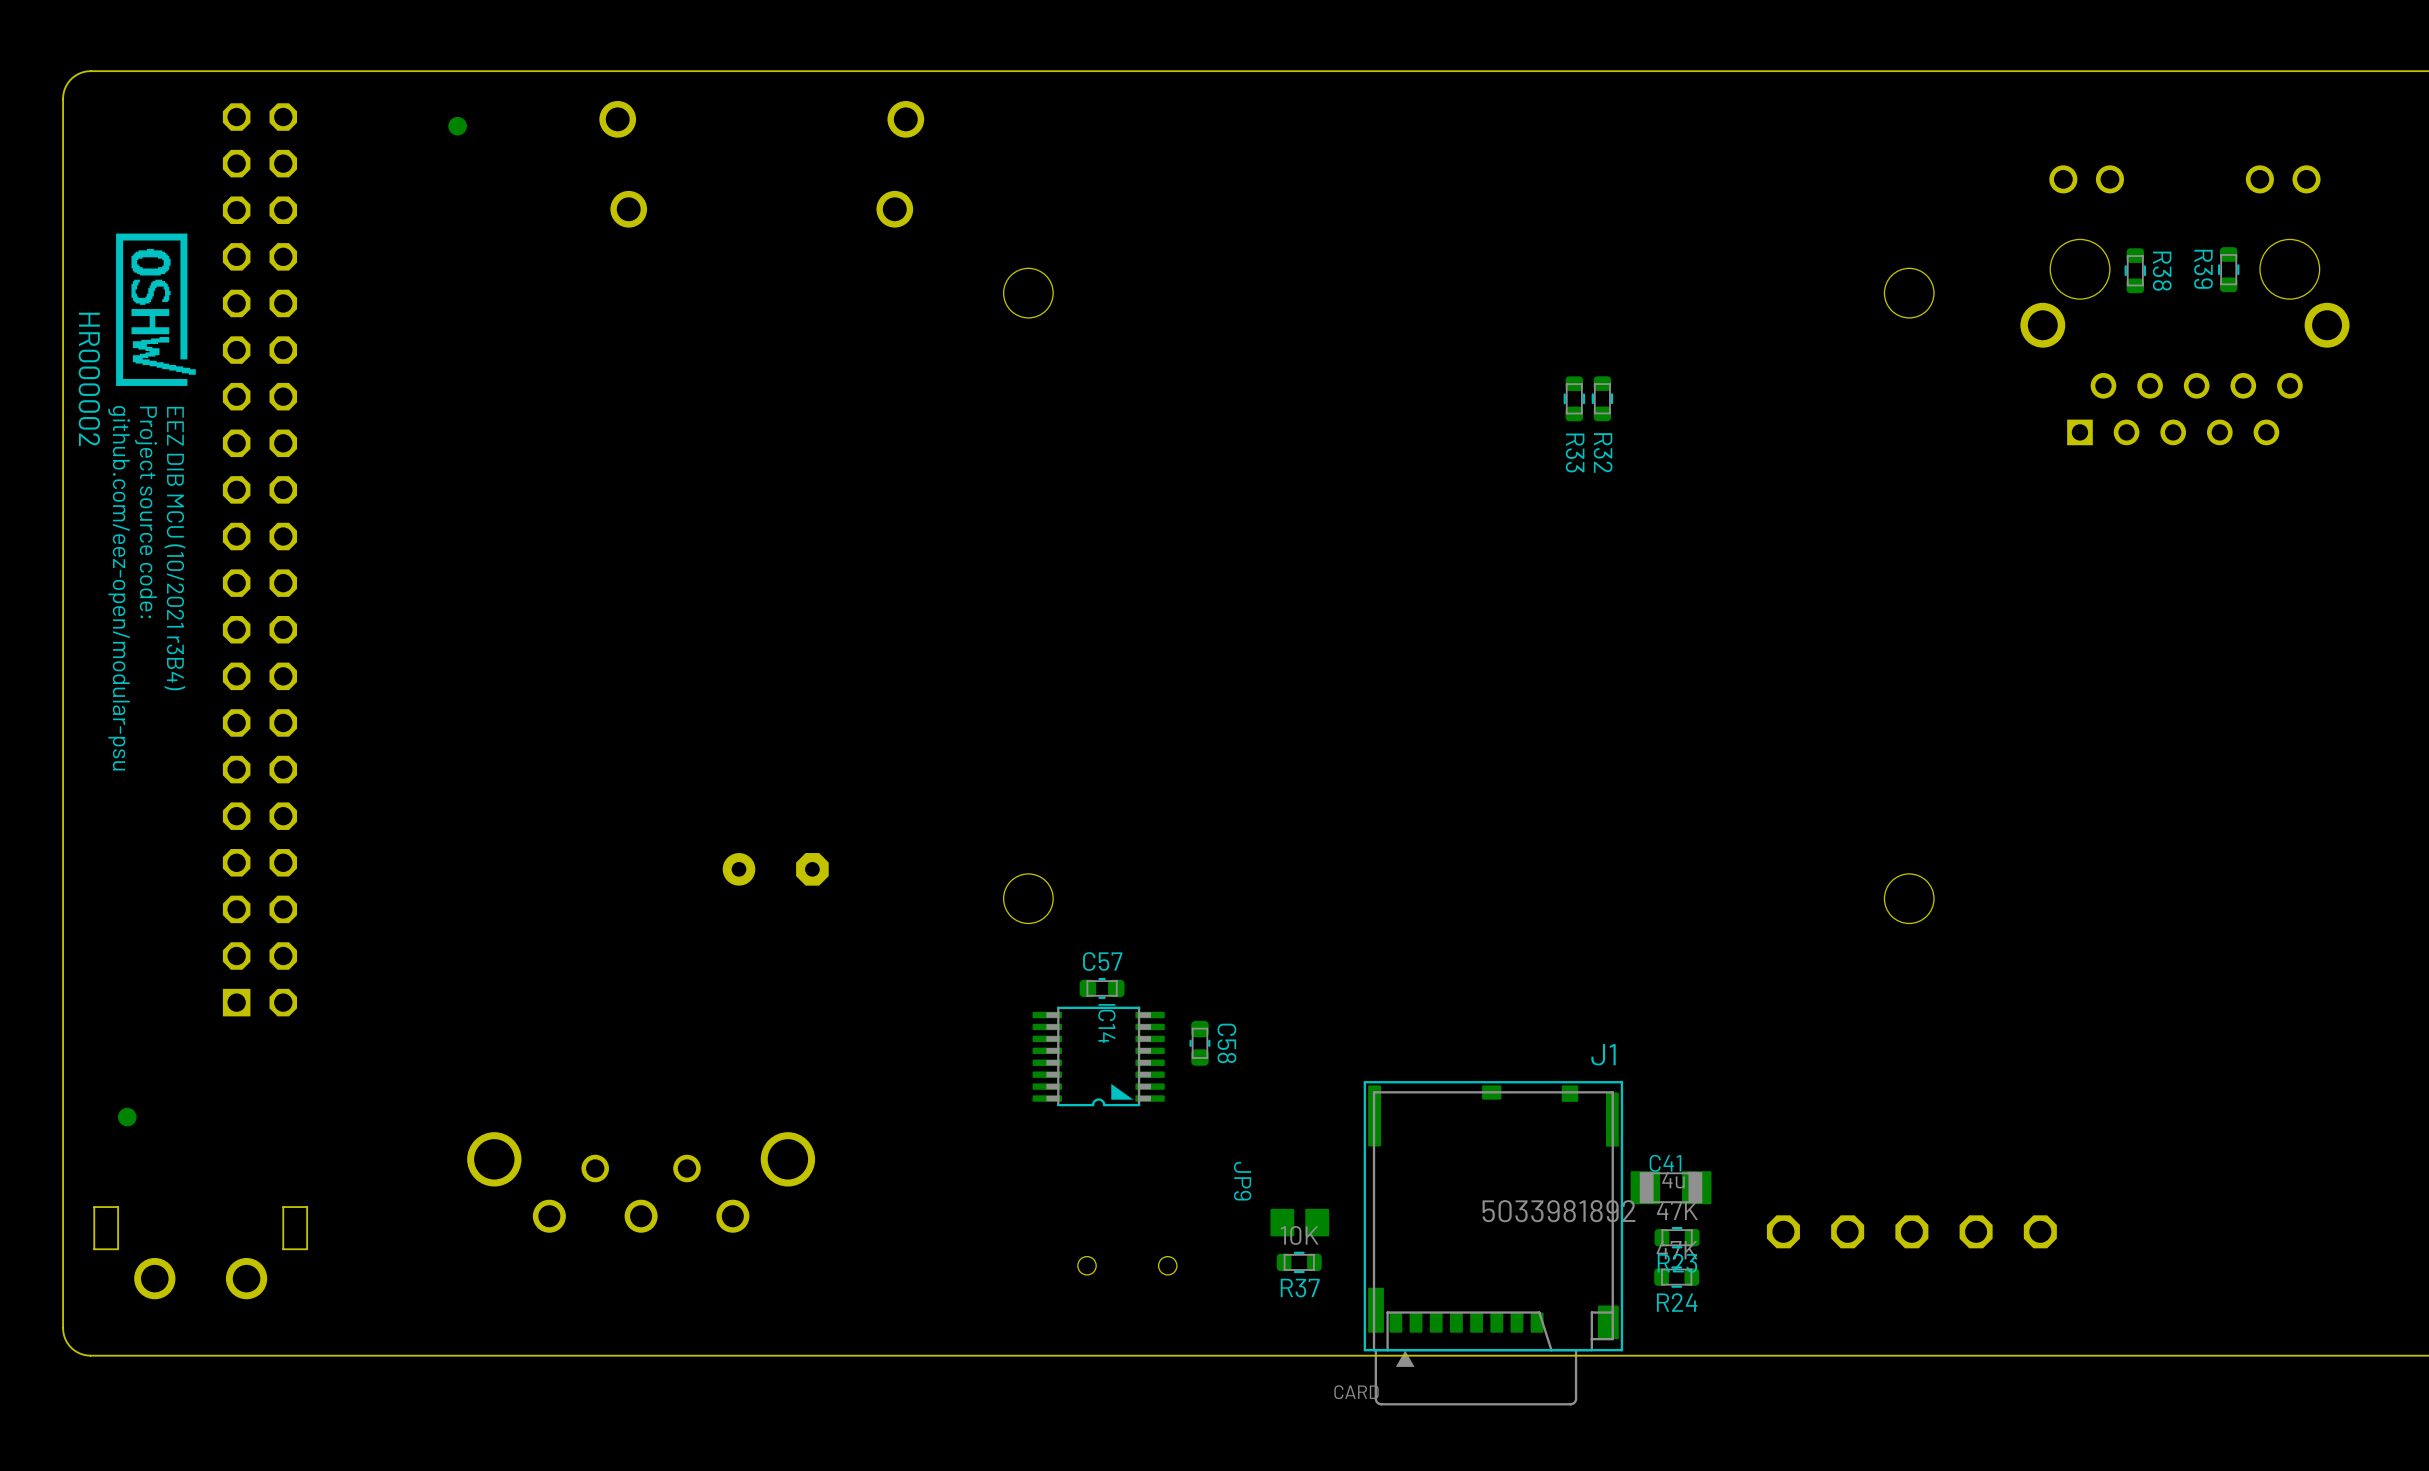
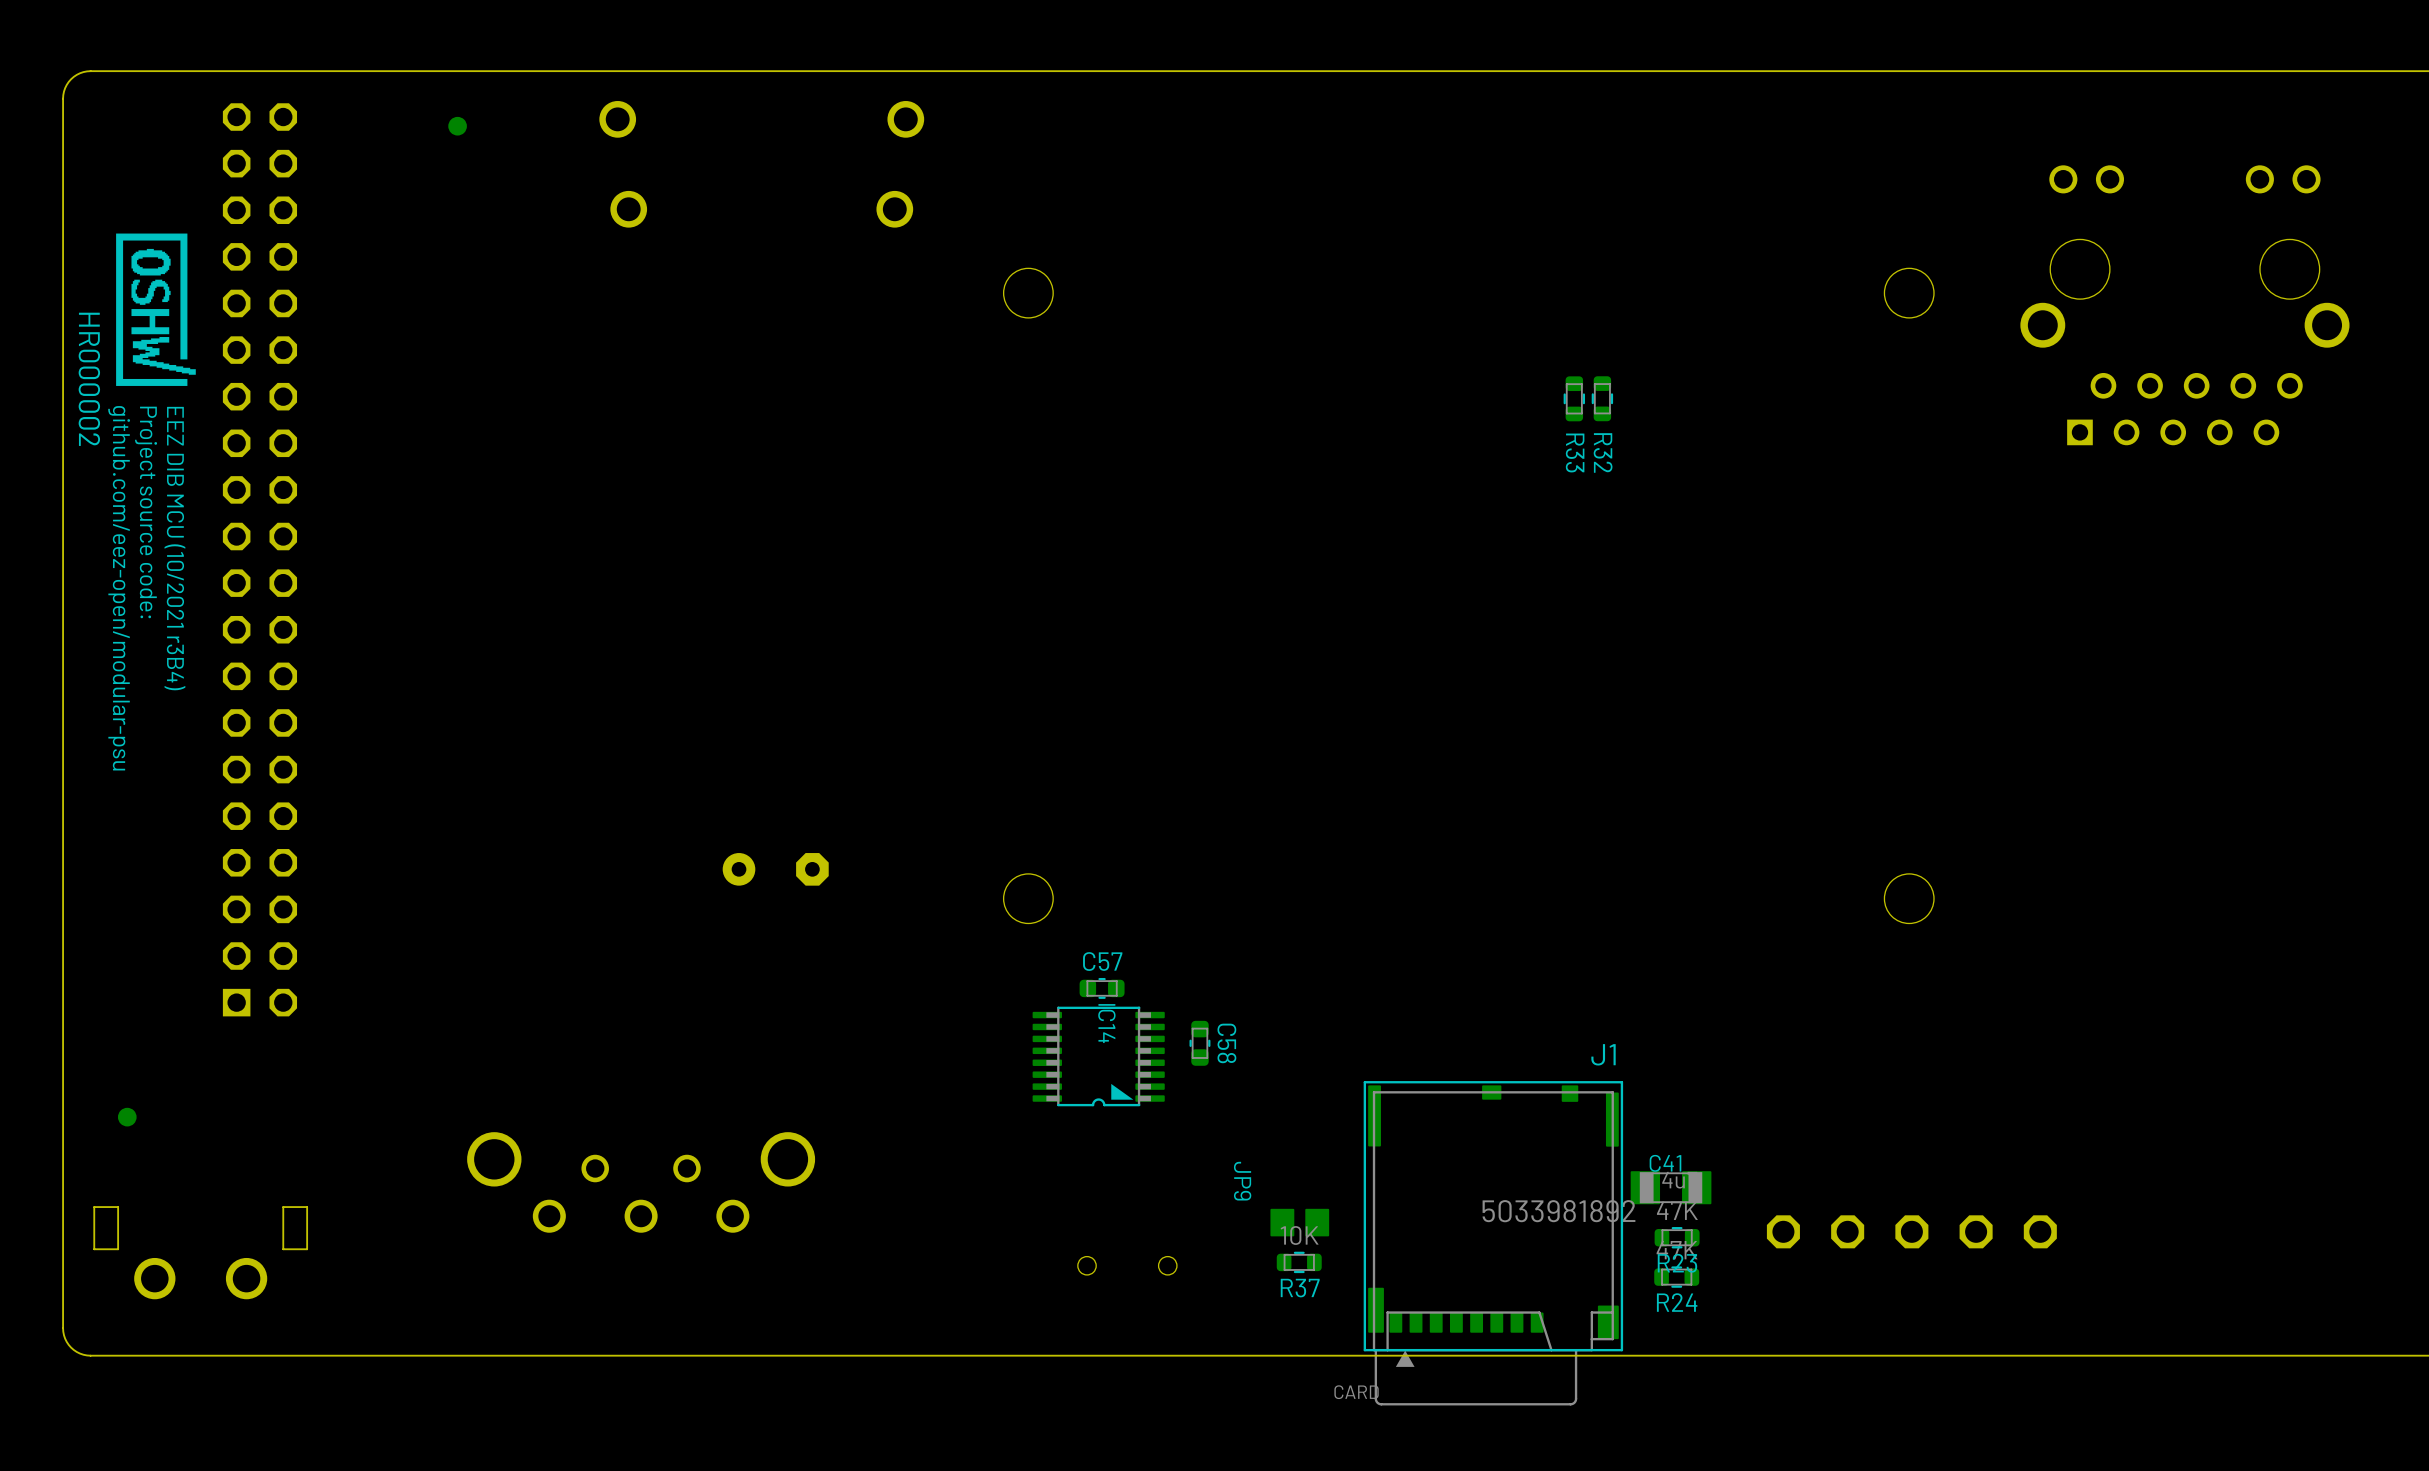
R39: (2228, 269) -> none
R38: (2135, 270) -> none

